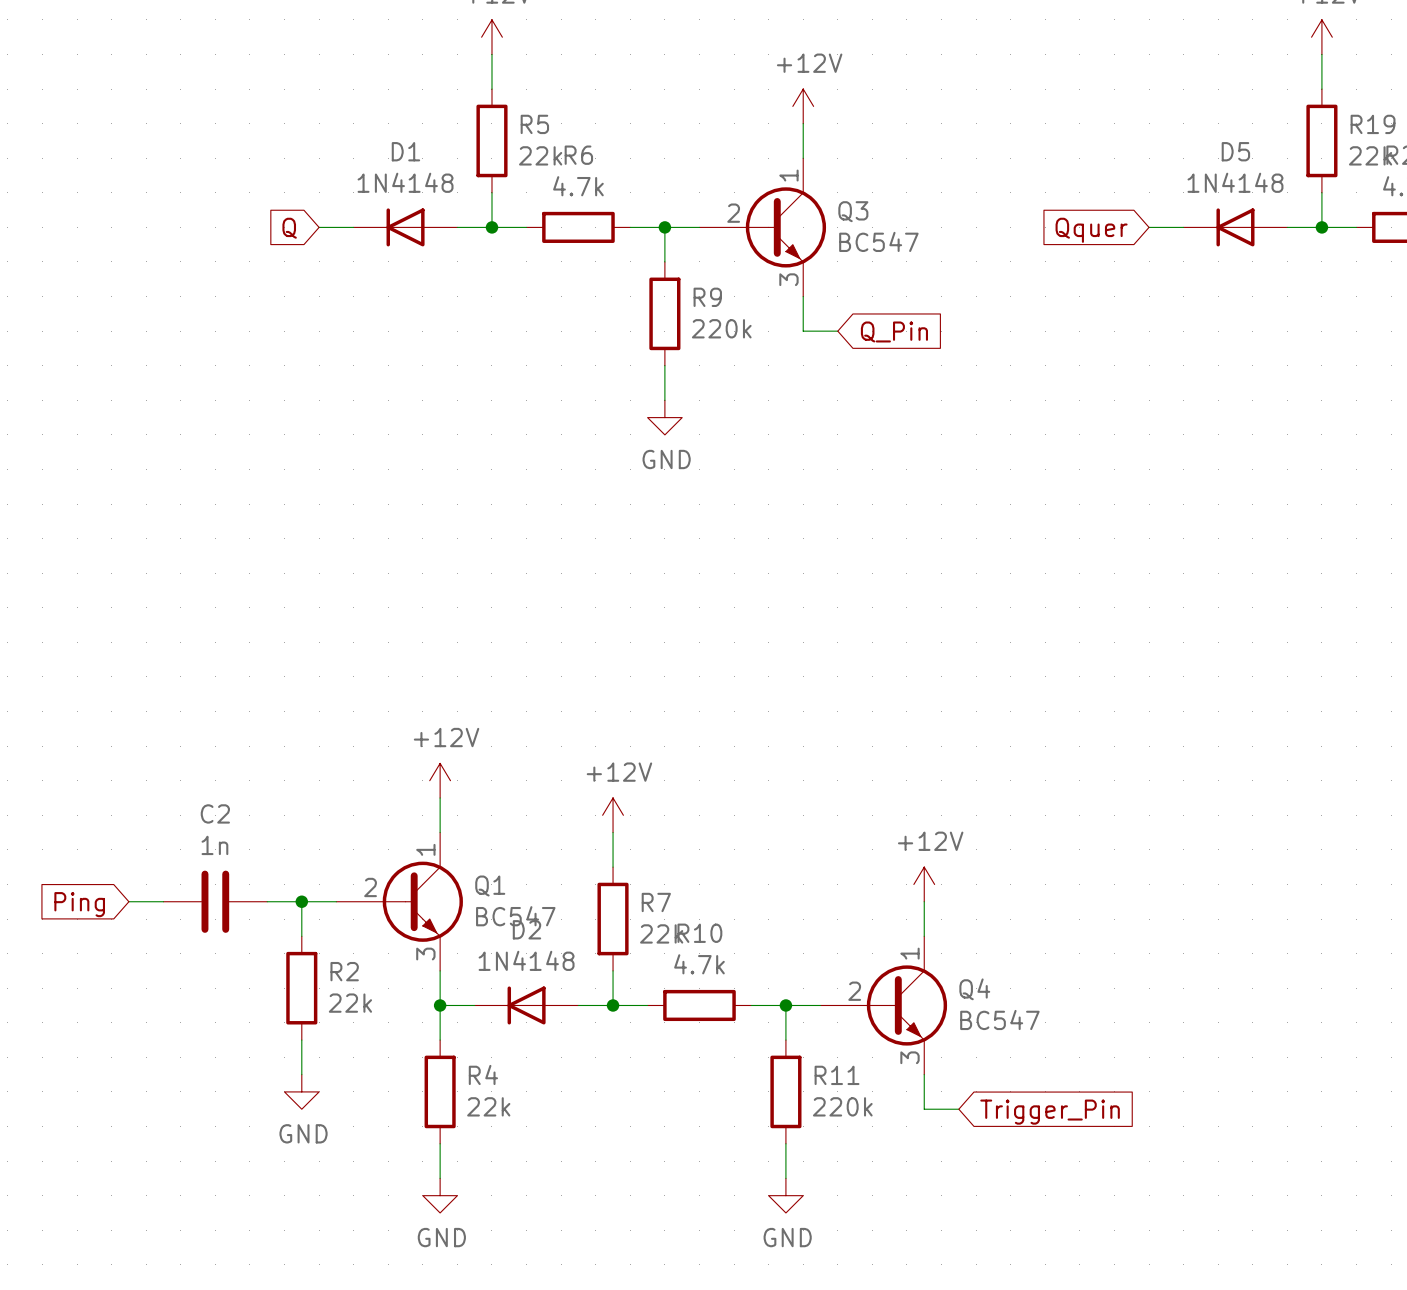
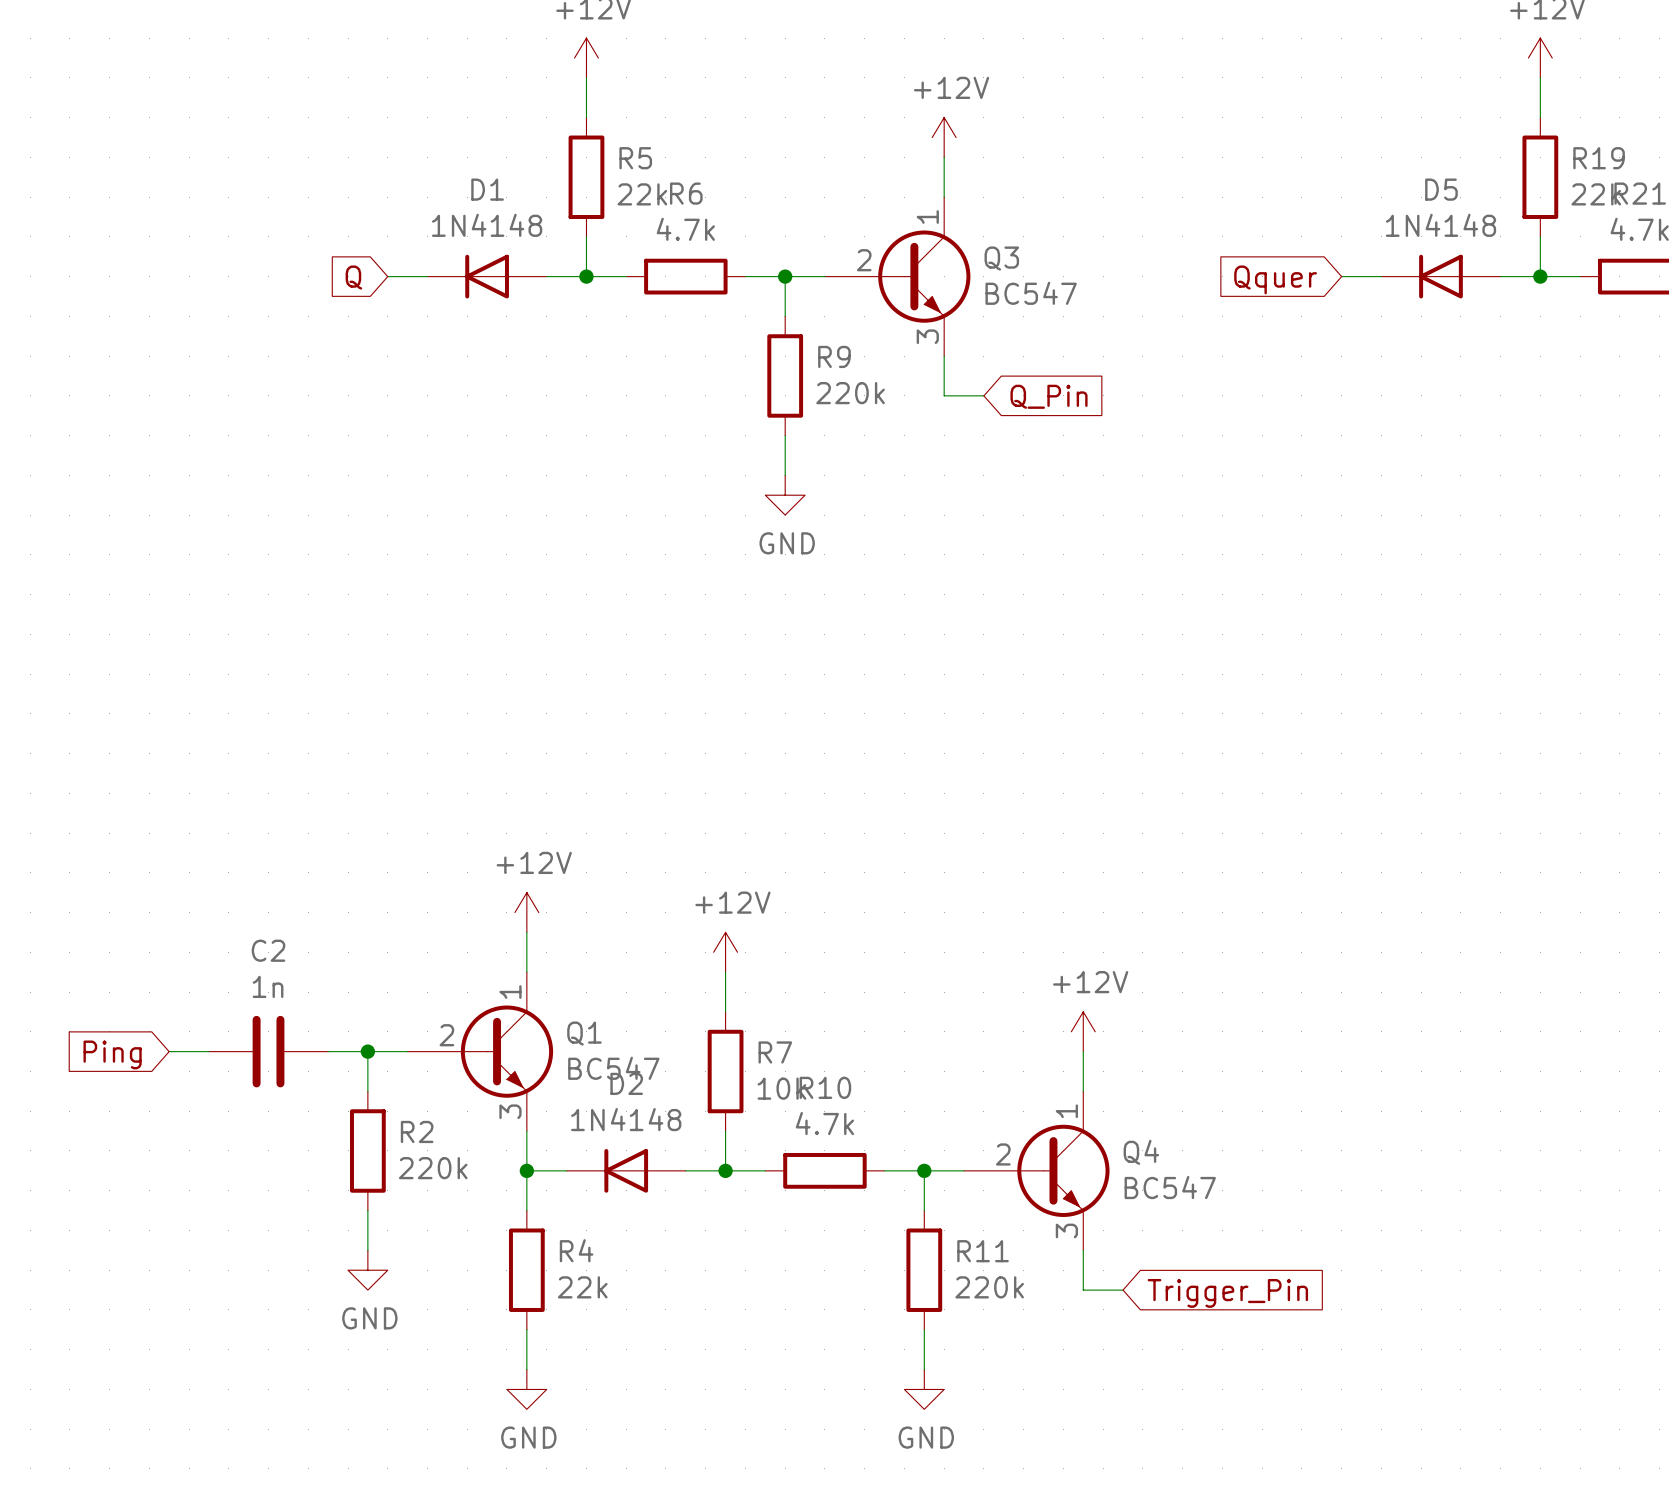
R7 value: 22k (661, 933) -> 10k (781, 1088)
R2 value: 22k (350, 1003) -> 220k (433, 1168)

